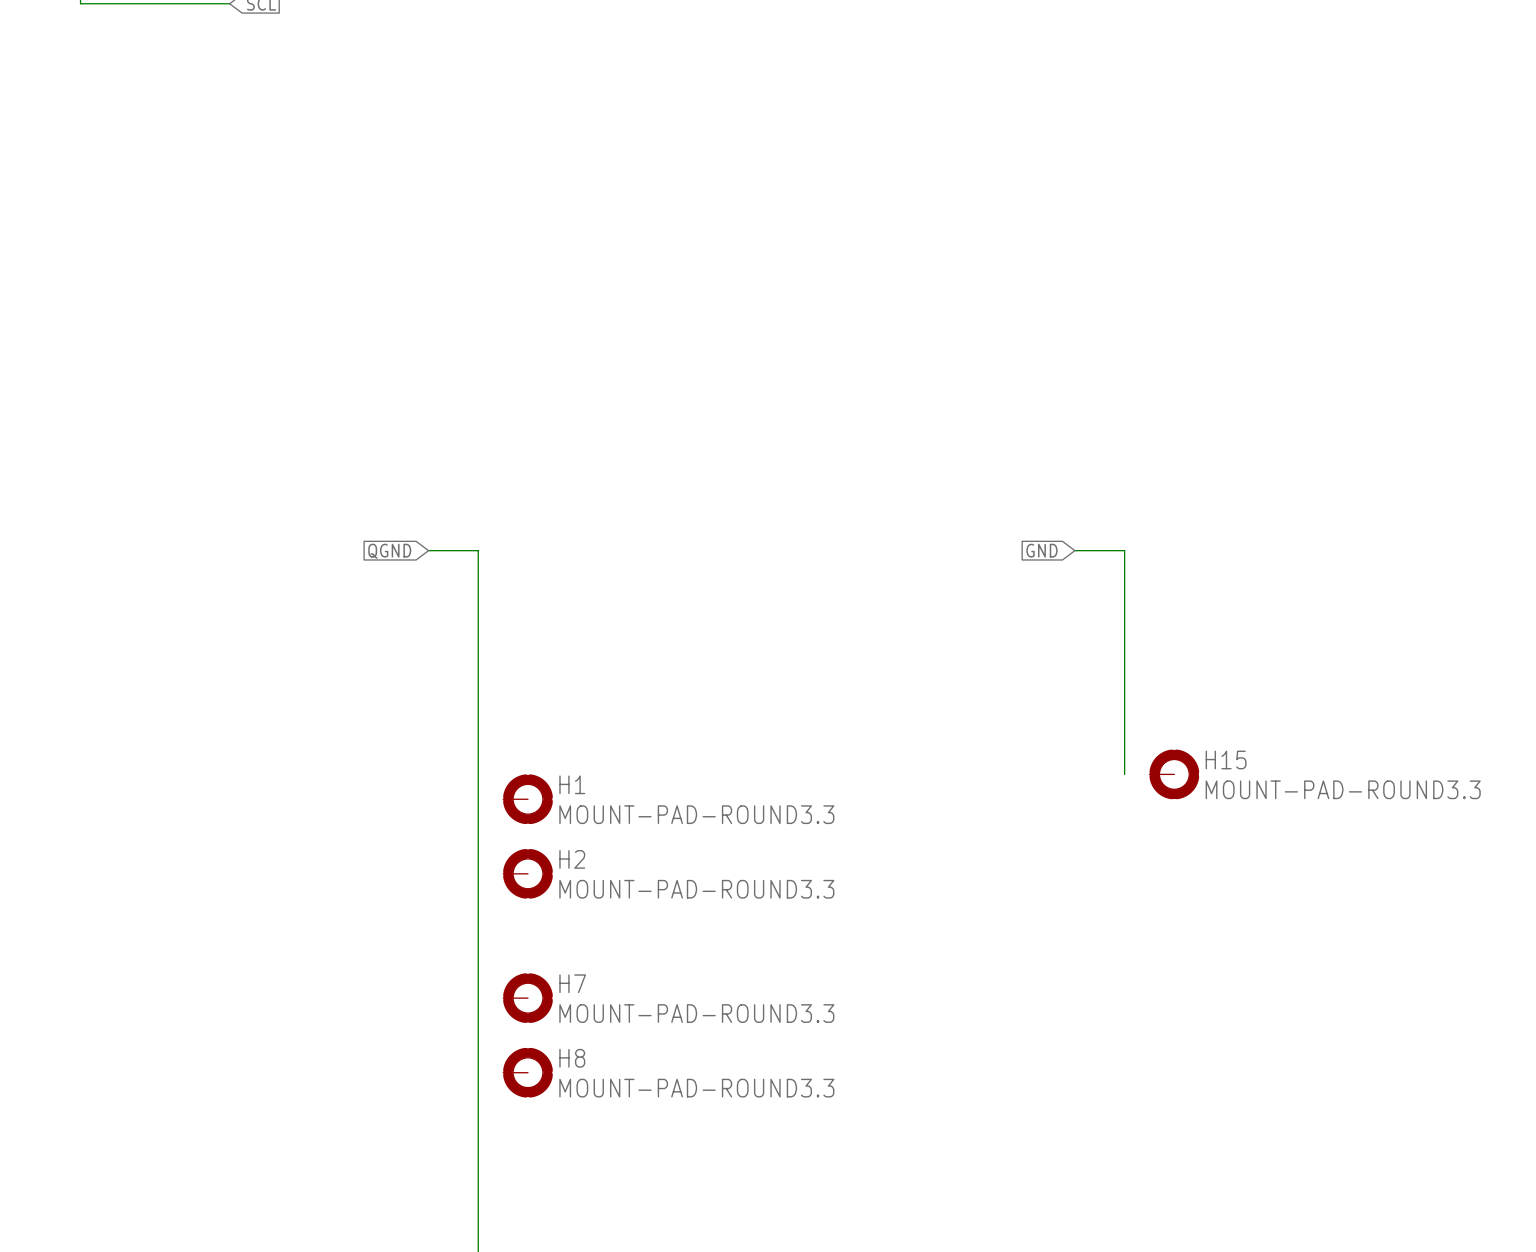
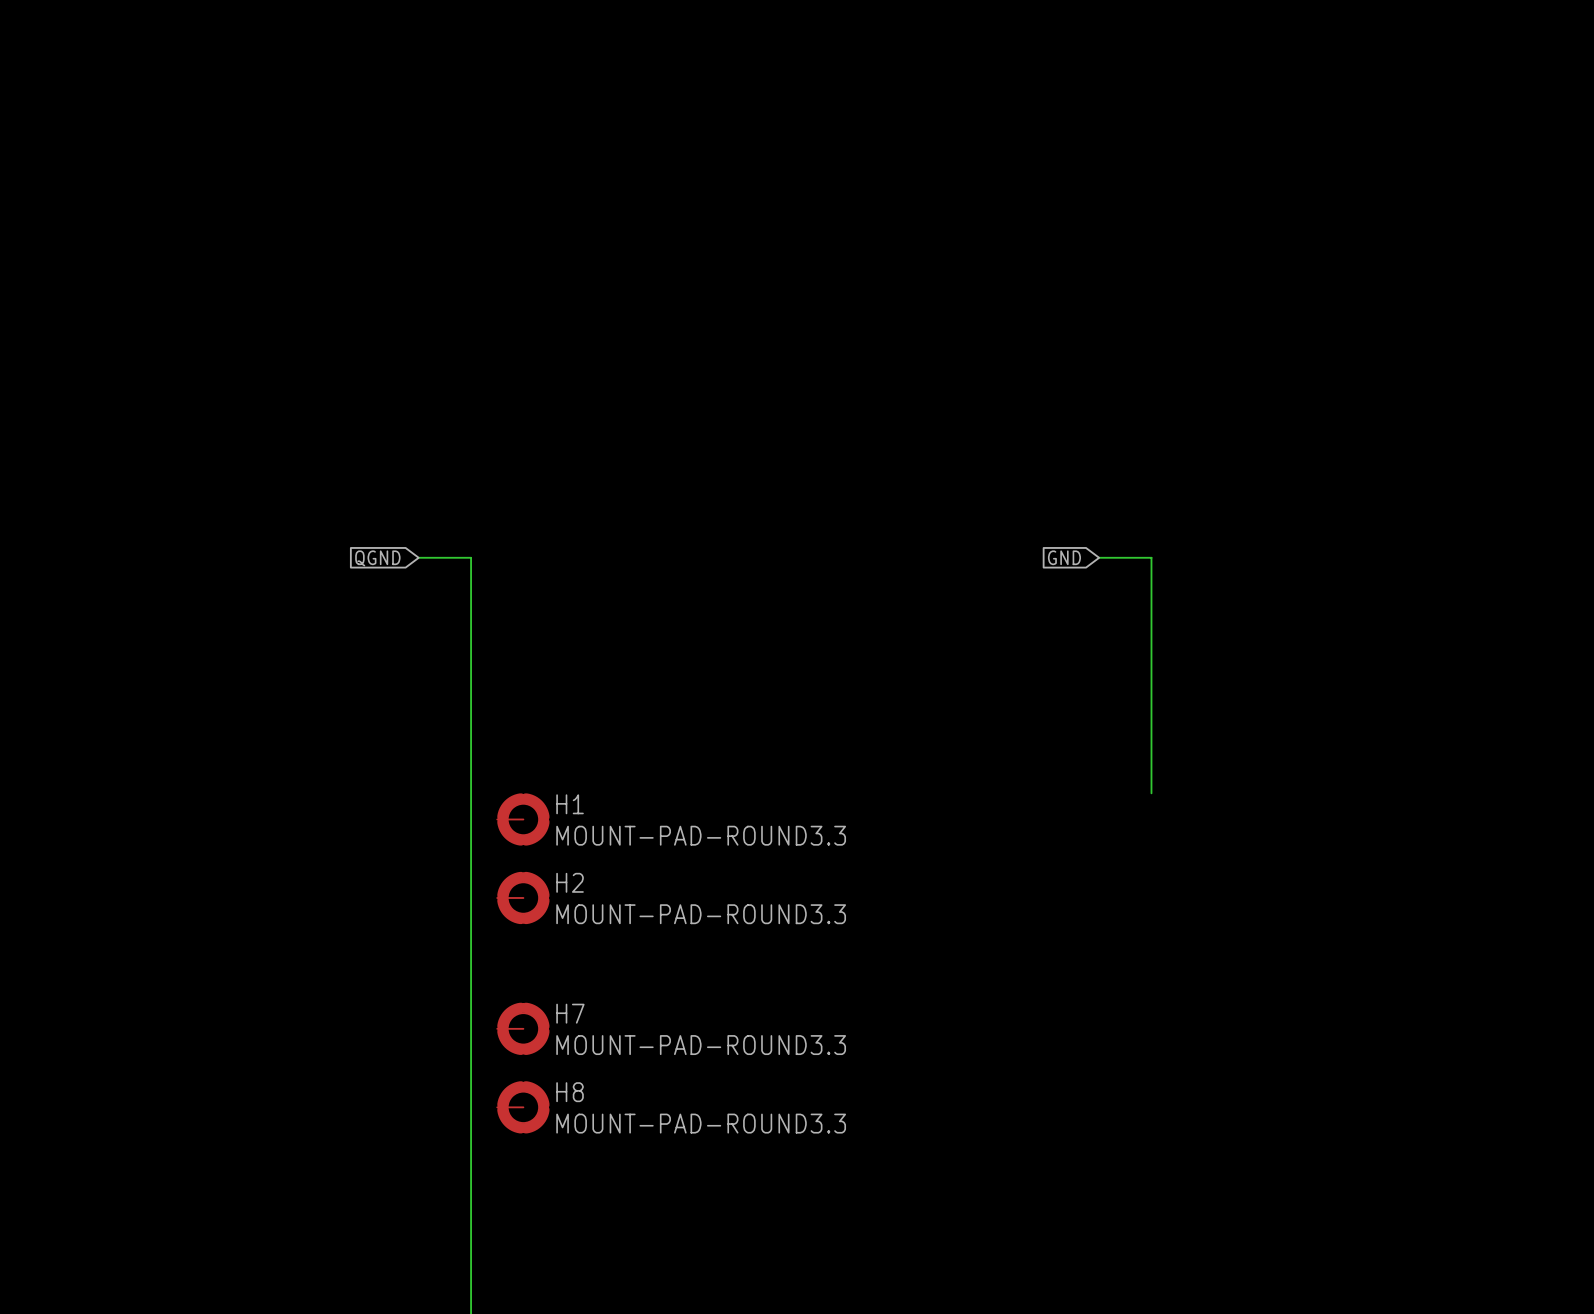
H15: MOUNT-PAD-ROUND3.3 (1174, 774) -> none

